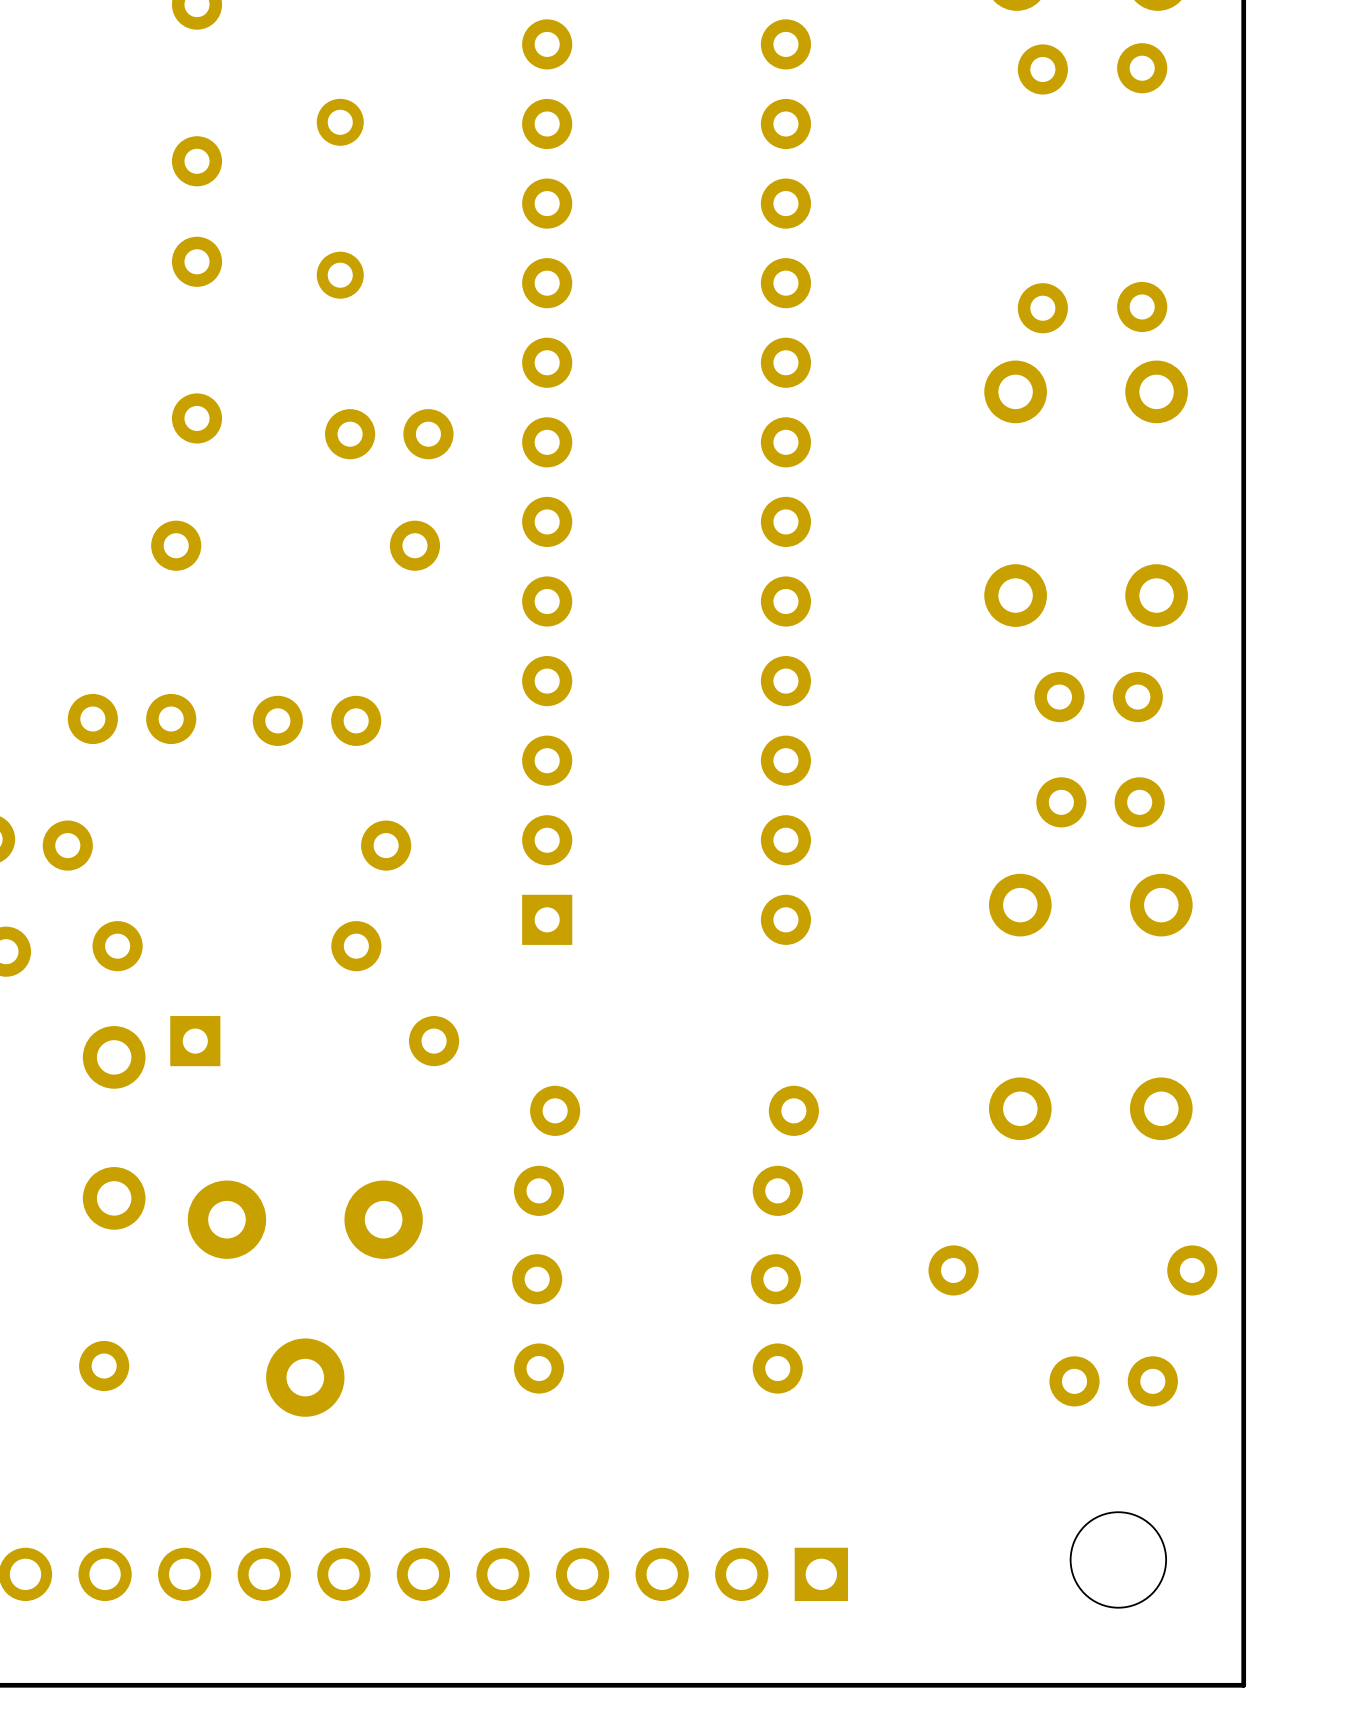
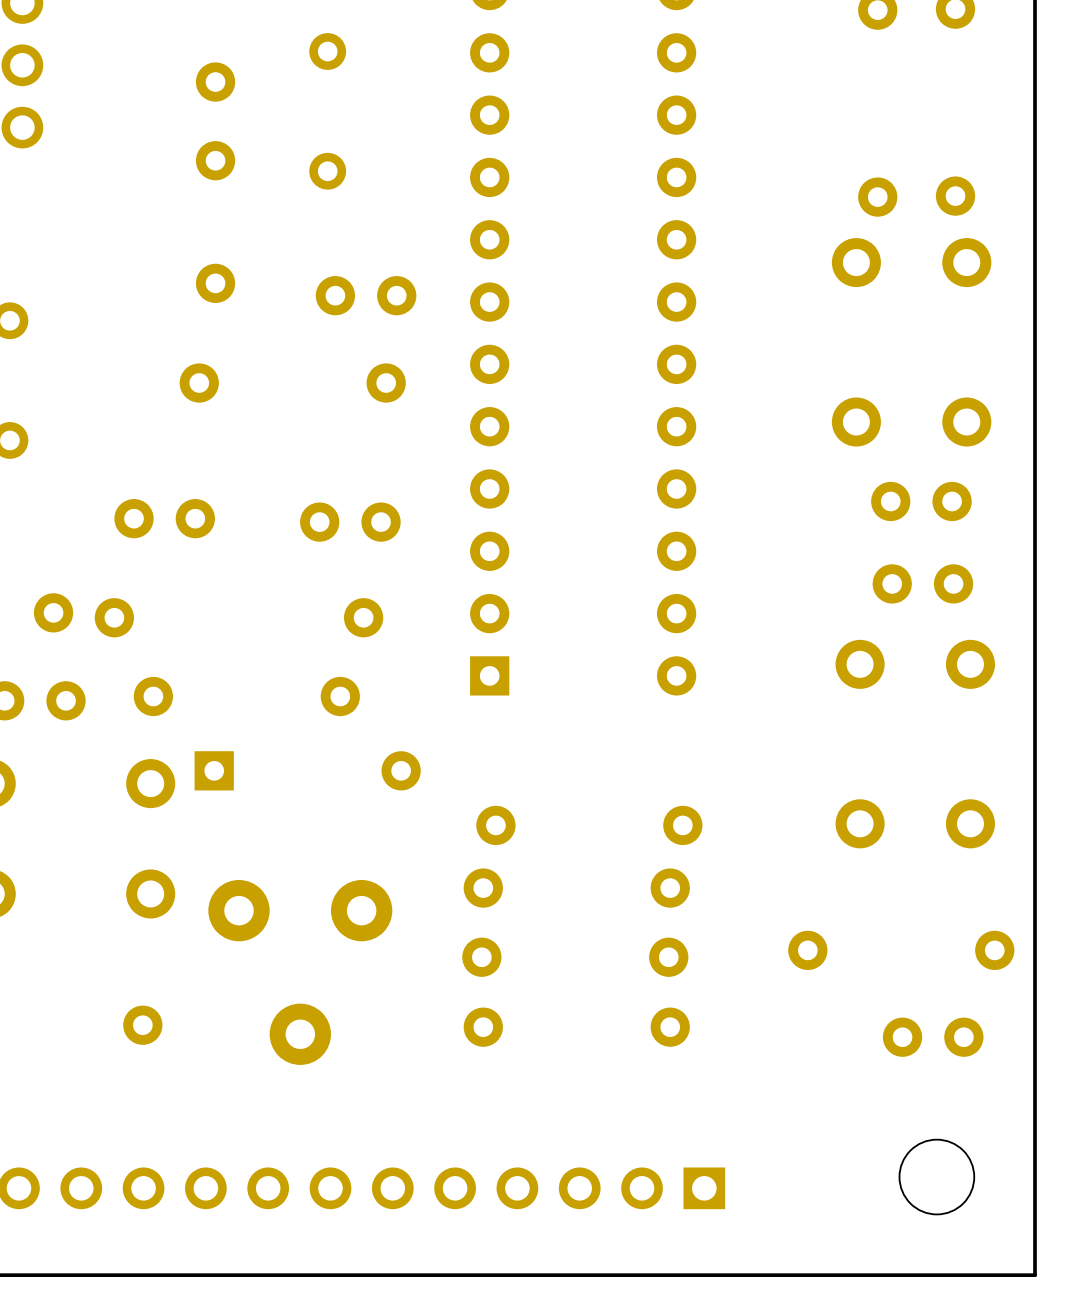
part position: (317, 720) -> (350, 522)

